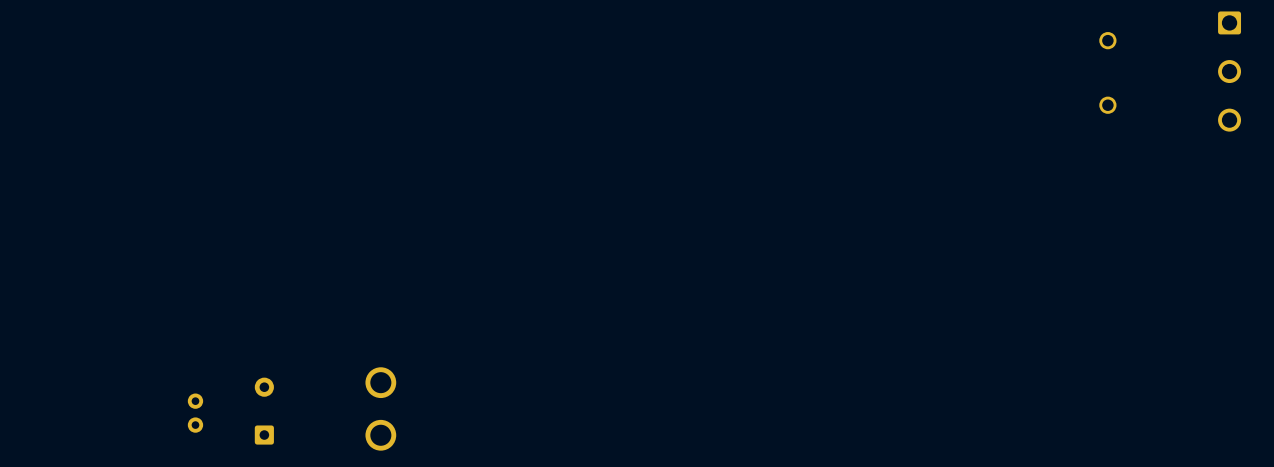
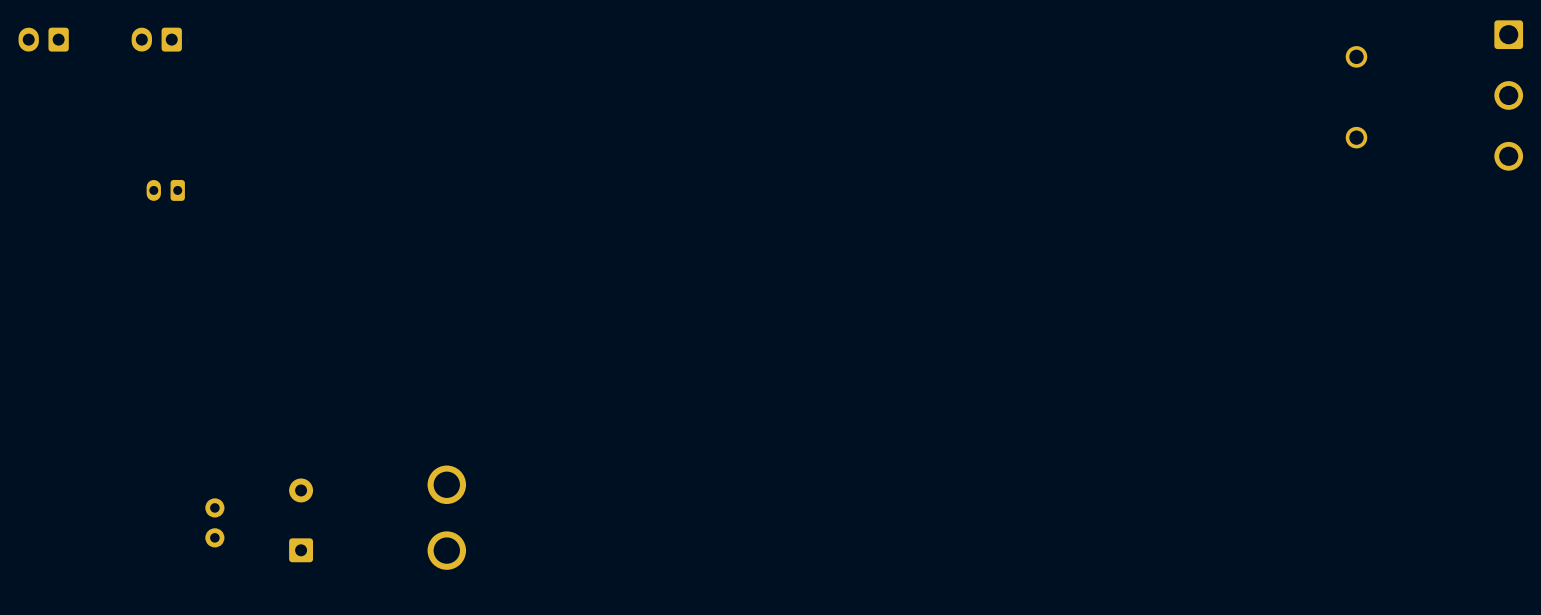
part: none -> (43, 39)
part: none -> (156, 39)
part: none -> (165, 190)

